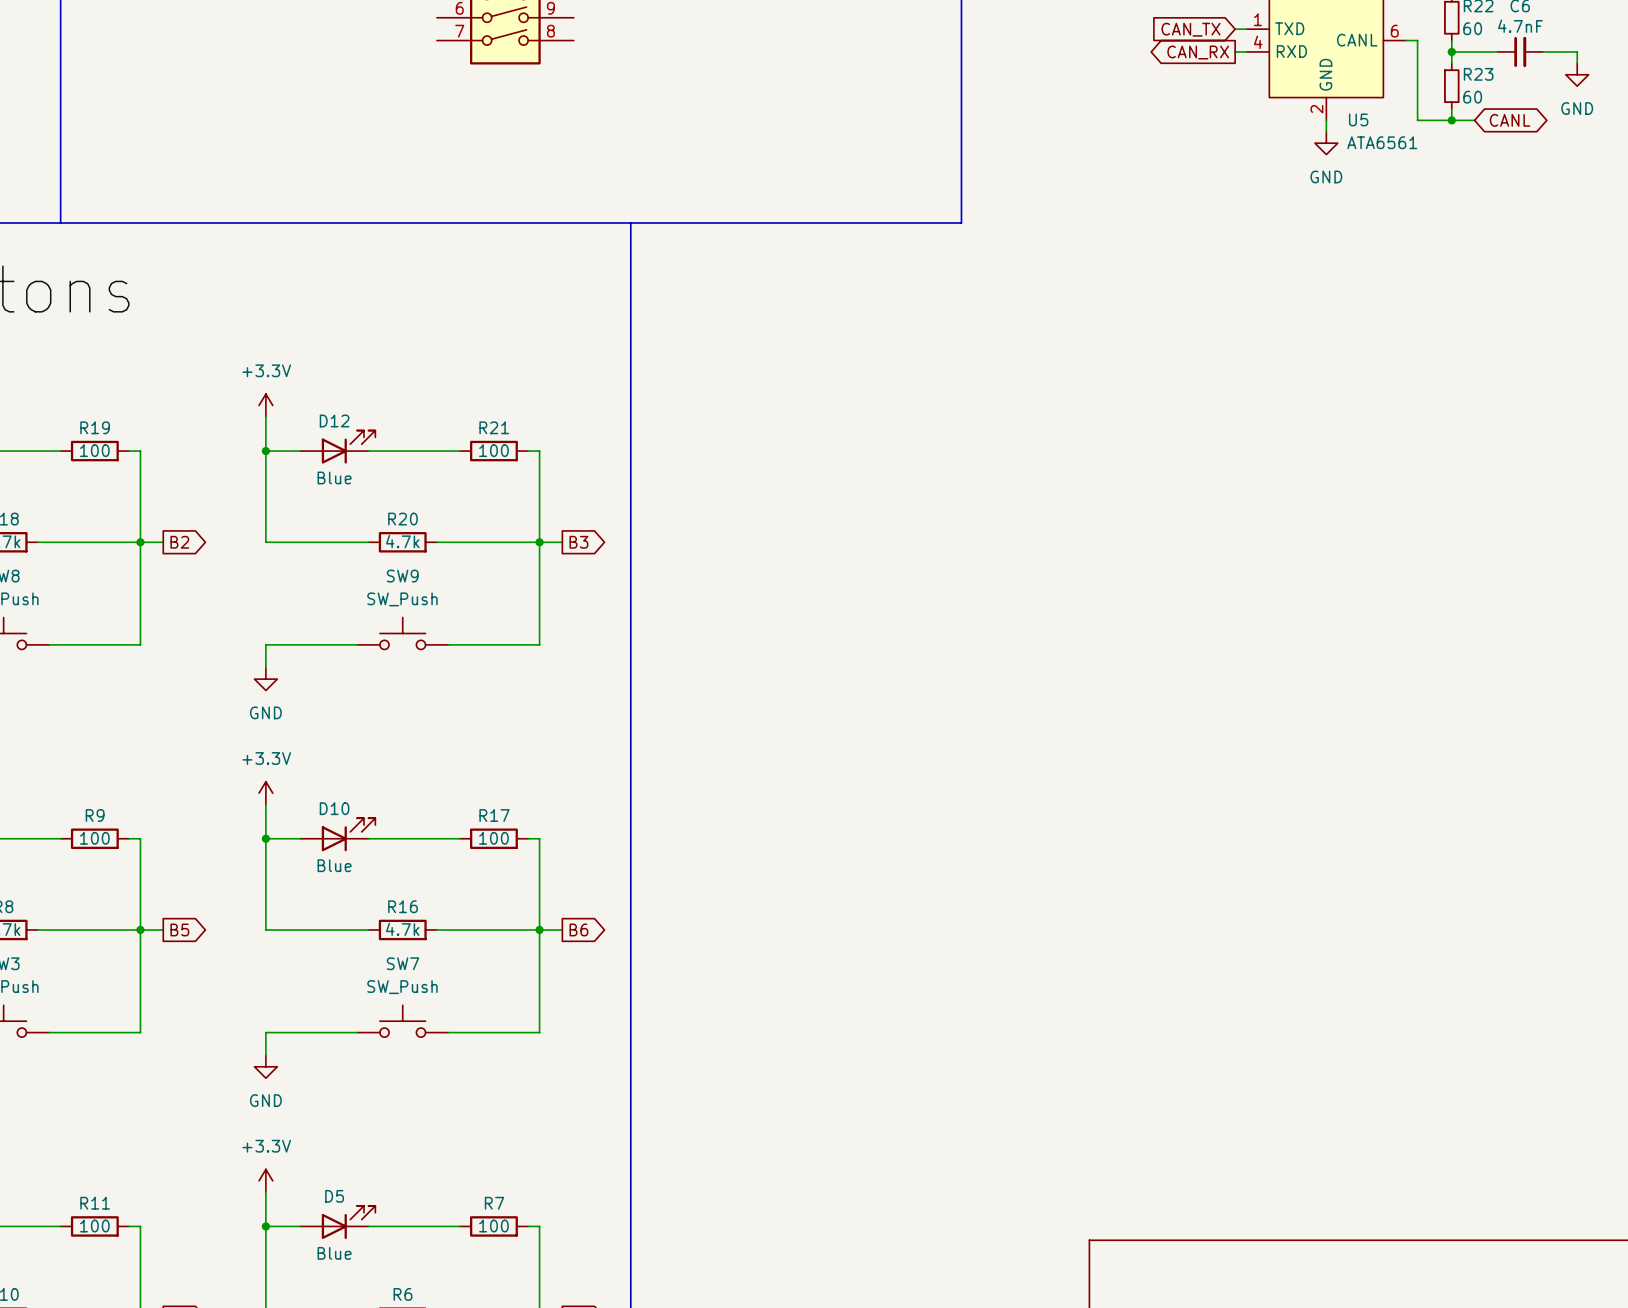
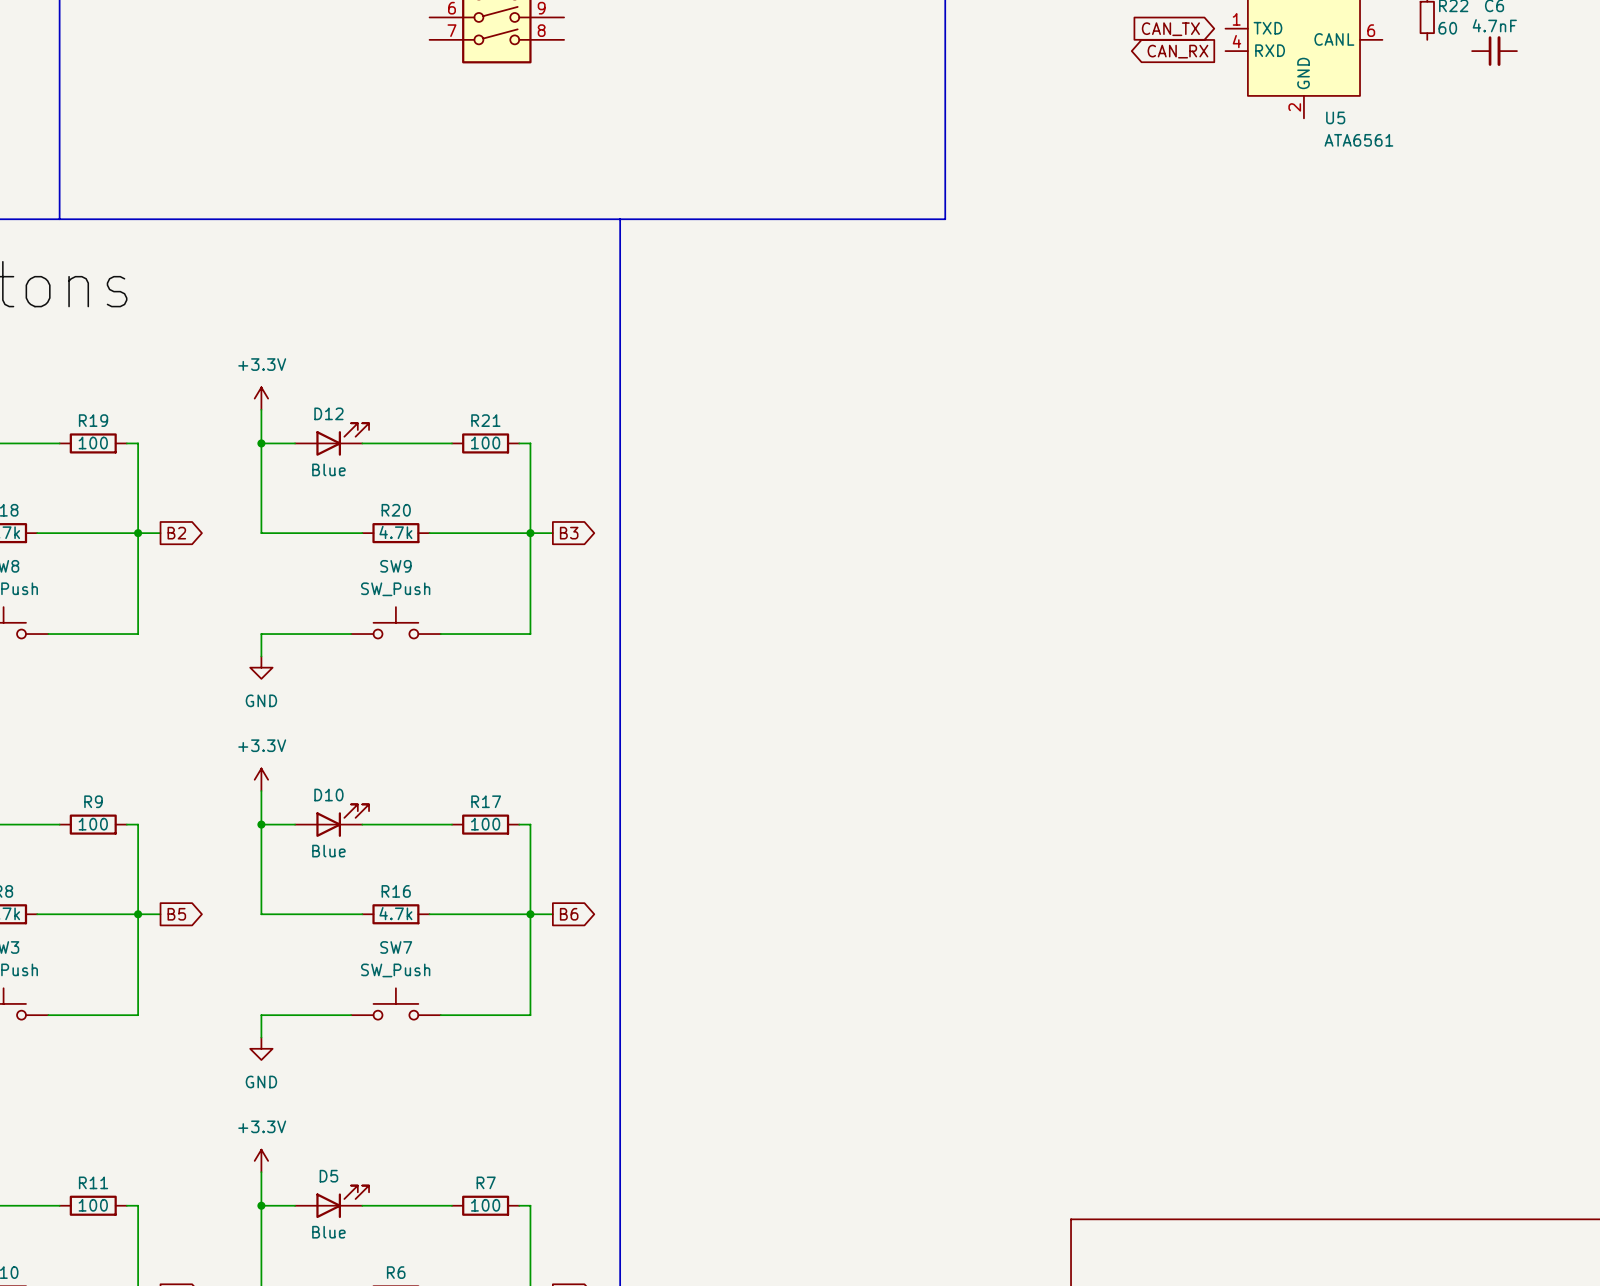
wire: (1235, 29) (1246, 29) -> none
wire: (1406, 40) (1417, 40) (1417, 120) (1474, 120) -> none
wire: (1451, 40) (1451, 63) -> none
wire: (1235, 51) (1246, 51) -> none
wire: (1451, 51) (1497, 51) -> none
junction: (1451, 51) -> none
wire: (1543, 51) (1577, 51) (1577, 63) -> none
power symbol: GND (1577, 74) -> none
R23: 60 (1451, 86) -> none
wire: (1451, 108) (1451, 120) -> none
wire: (1326, 120) (1326, 131) -> none
junction: (1451, 120) -> none
global label: CANL (1510, 120) -> none
power symbol: GND (1326, 143) -> none

